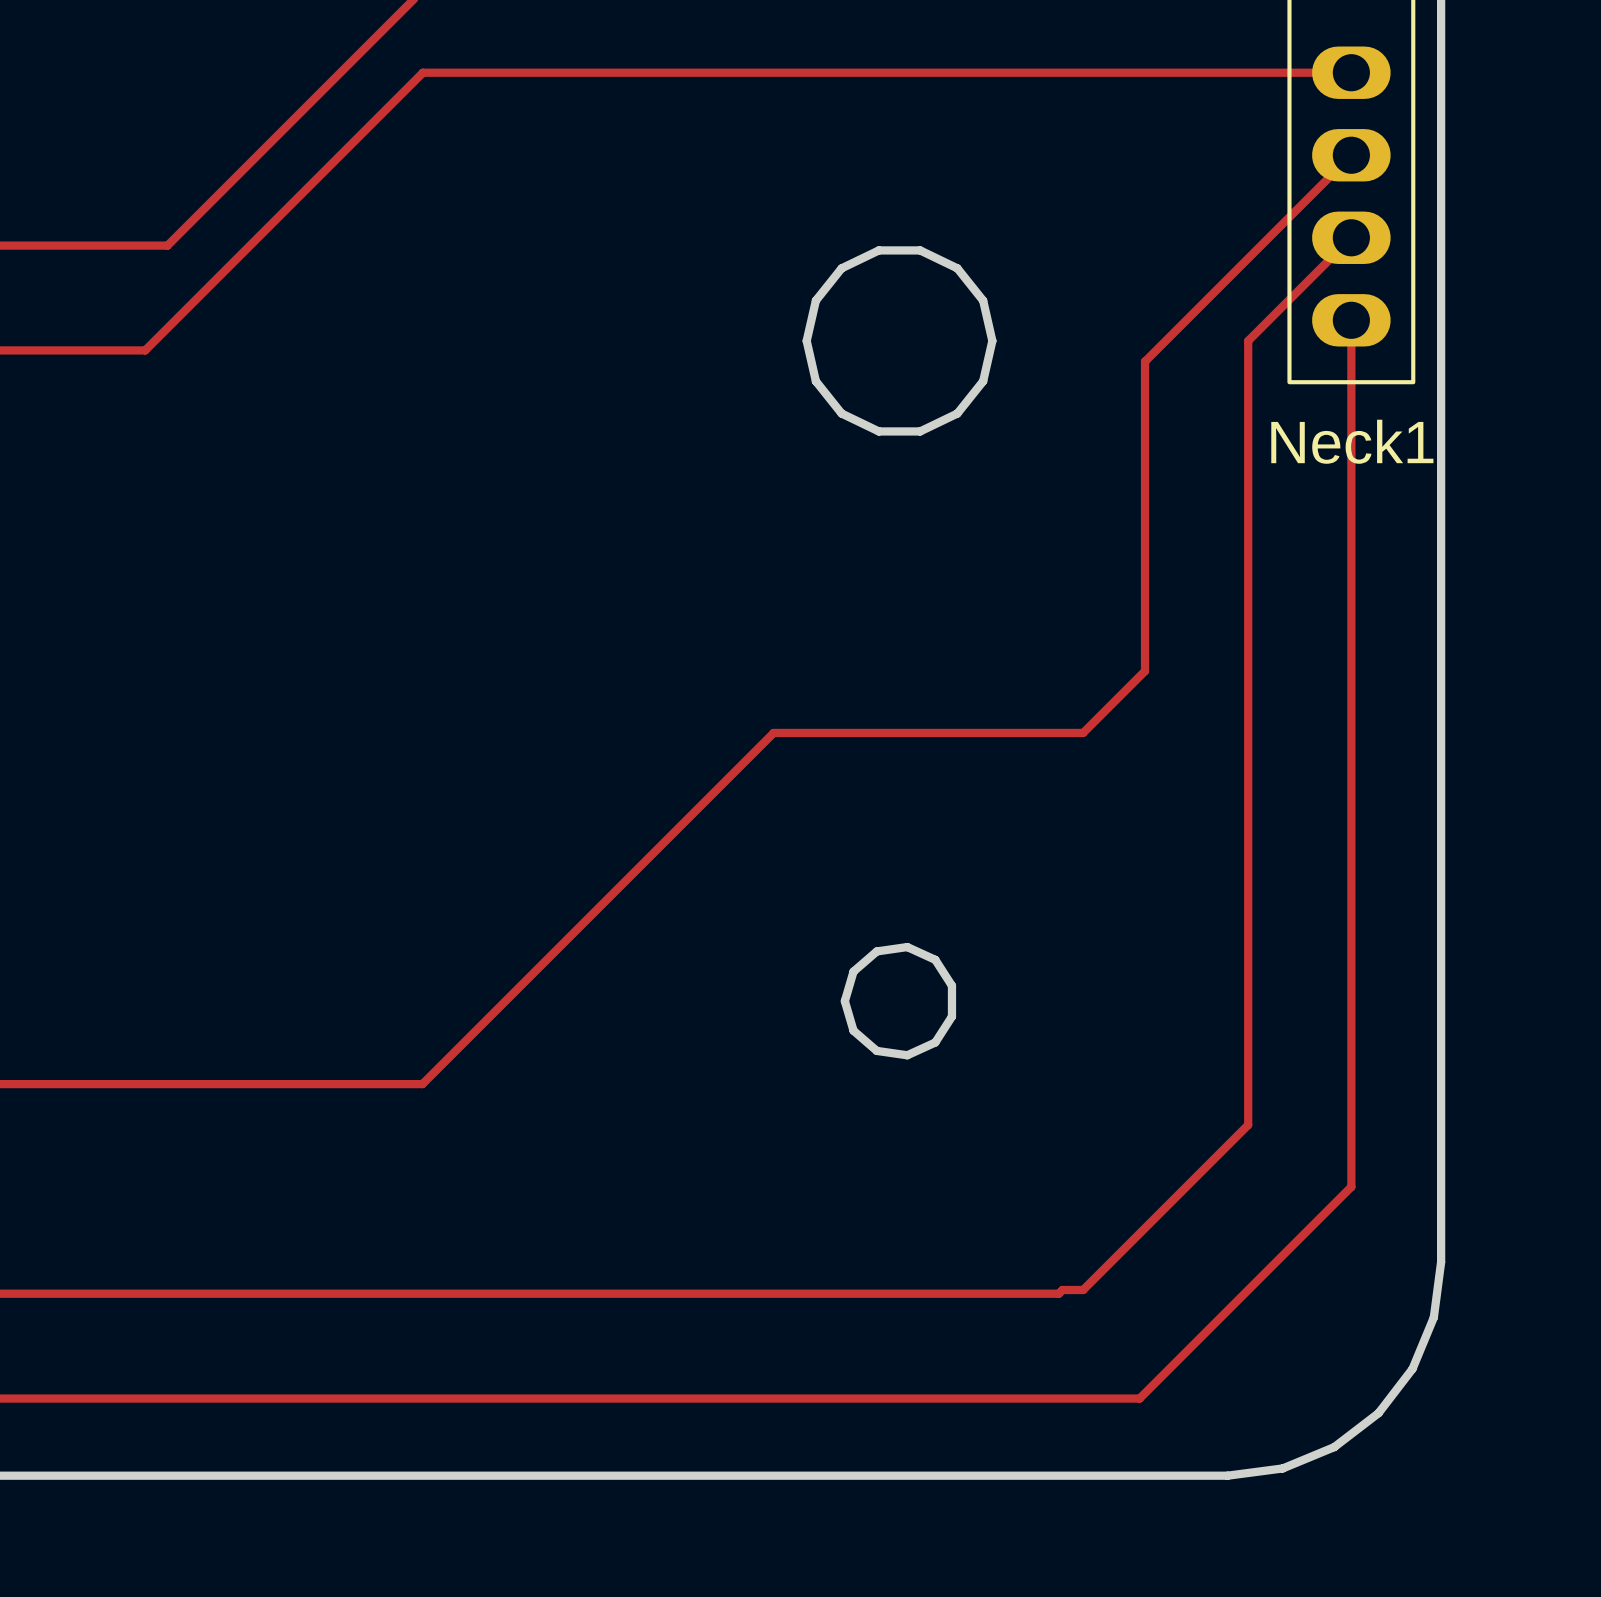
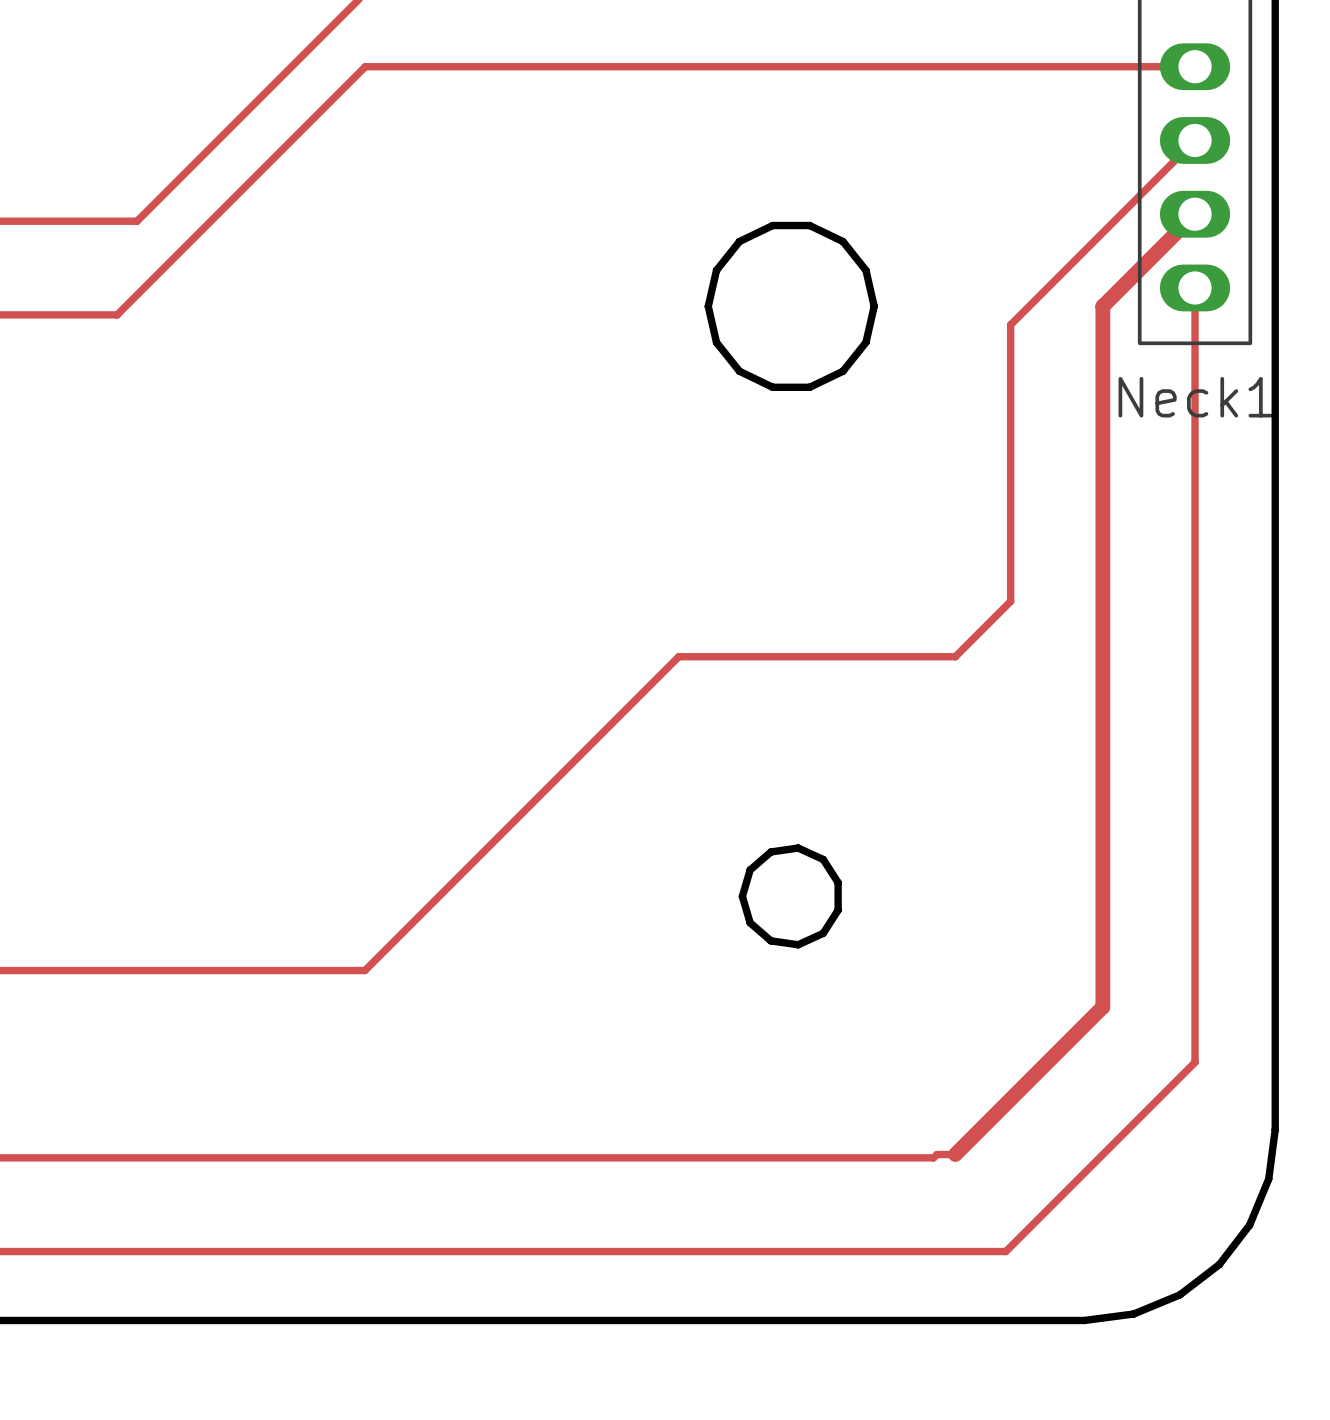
top track width: thin (1351, 237) (1248, 340) (1248, 1124) (1083, 1290) -> thick (1195, 214) (1102, 306) (1102, 1007) (955, 1154)

